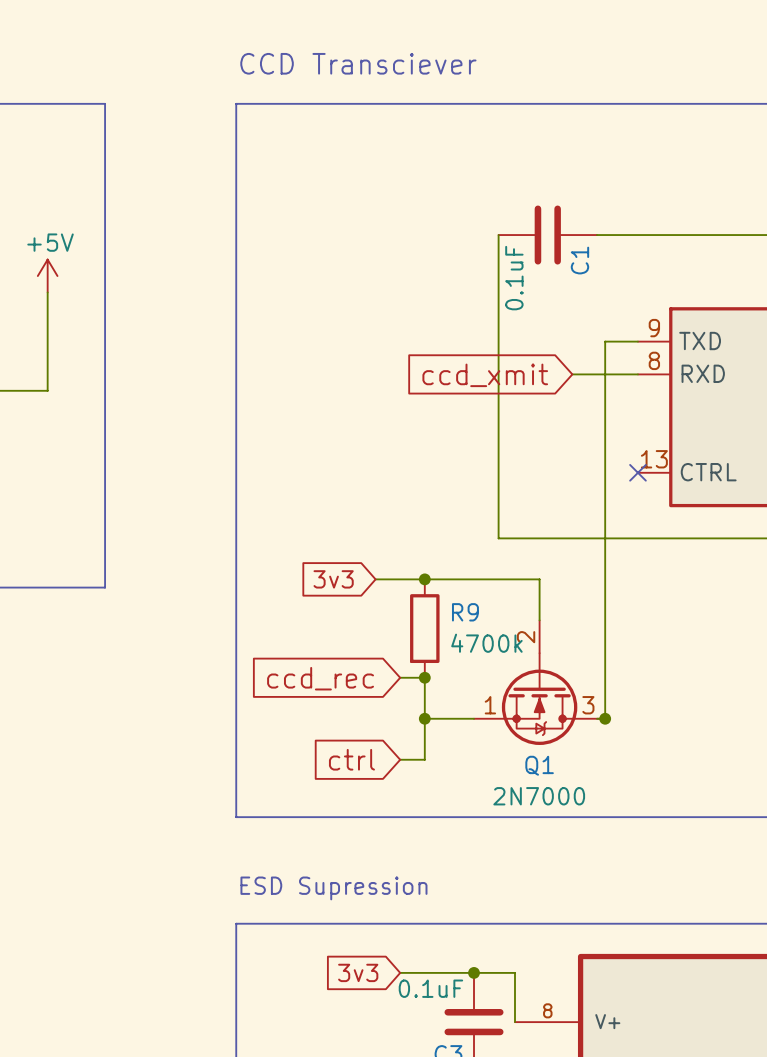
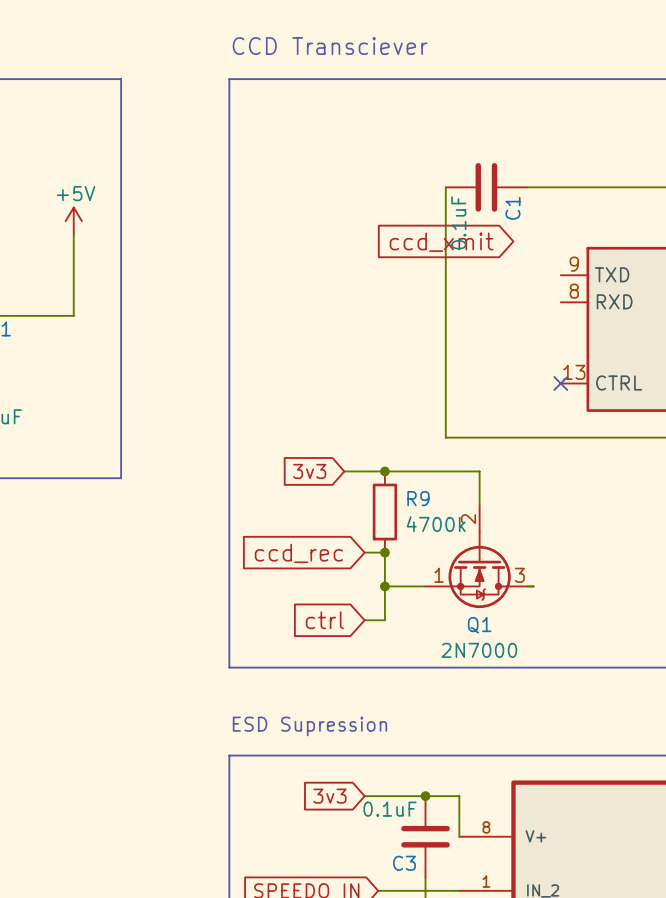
wire: (637, 341) (605, 341) (605, 718) -> none
wire: (572, 374) (637, 374) -> none
global label position: ccd_xmit (485, 375) -> ccd_xmit (441, 242)
junction: (605, 718) -> none

